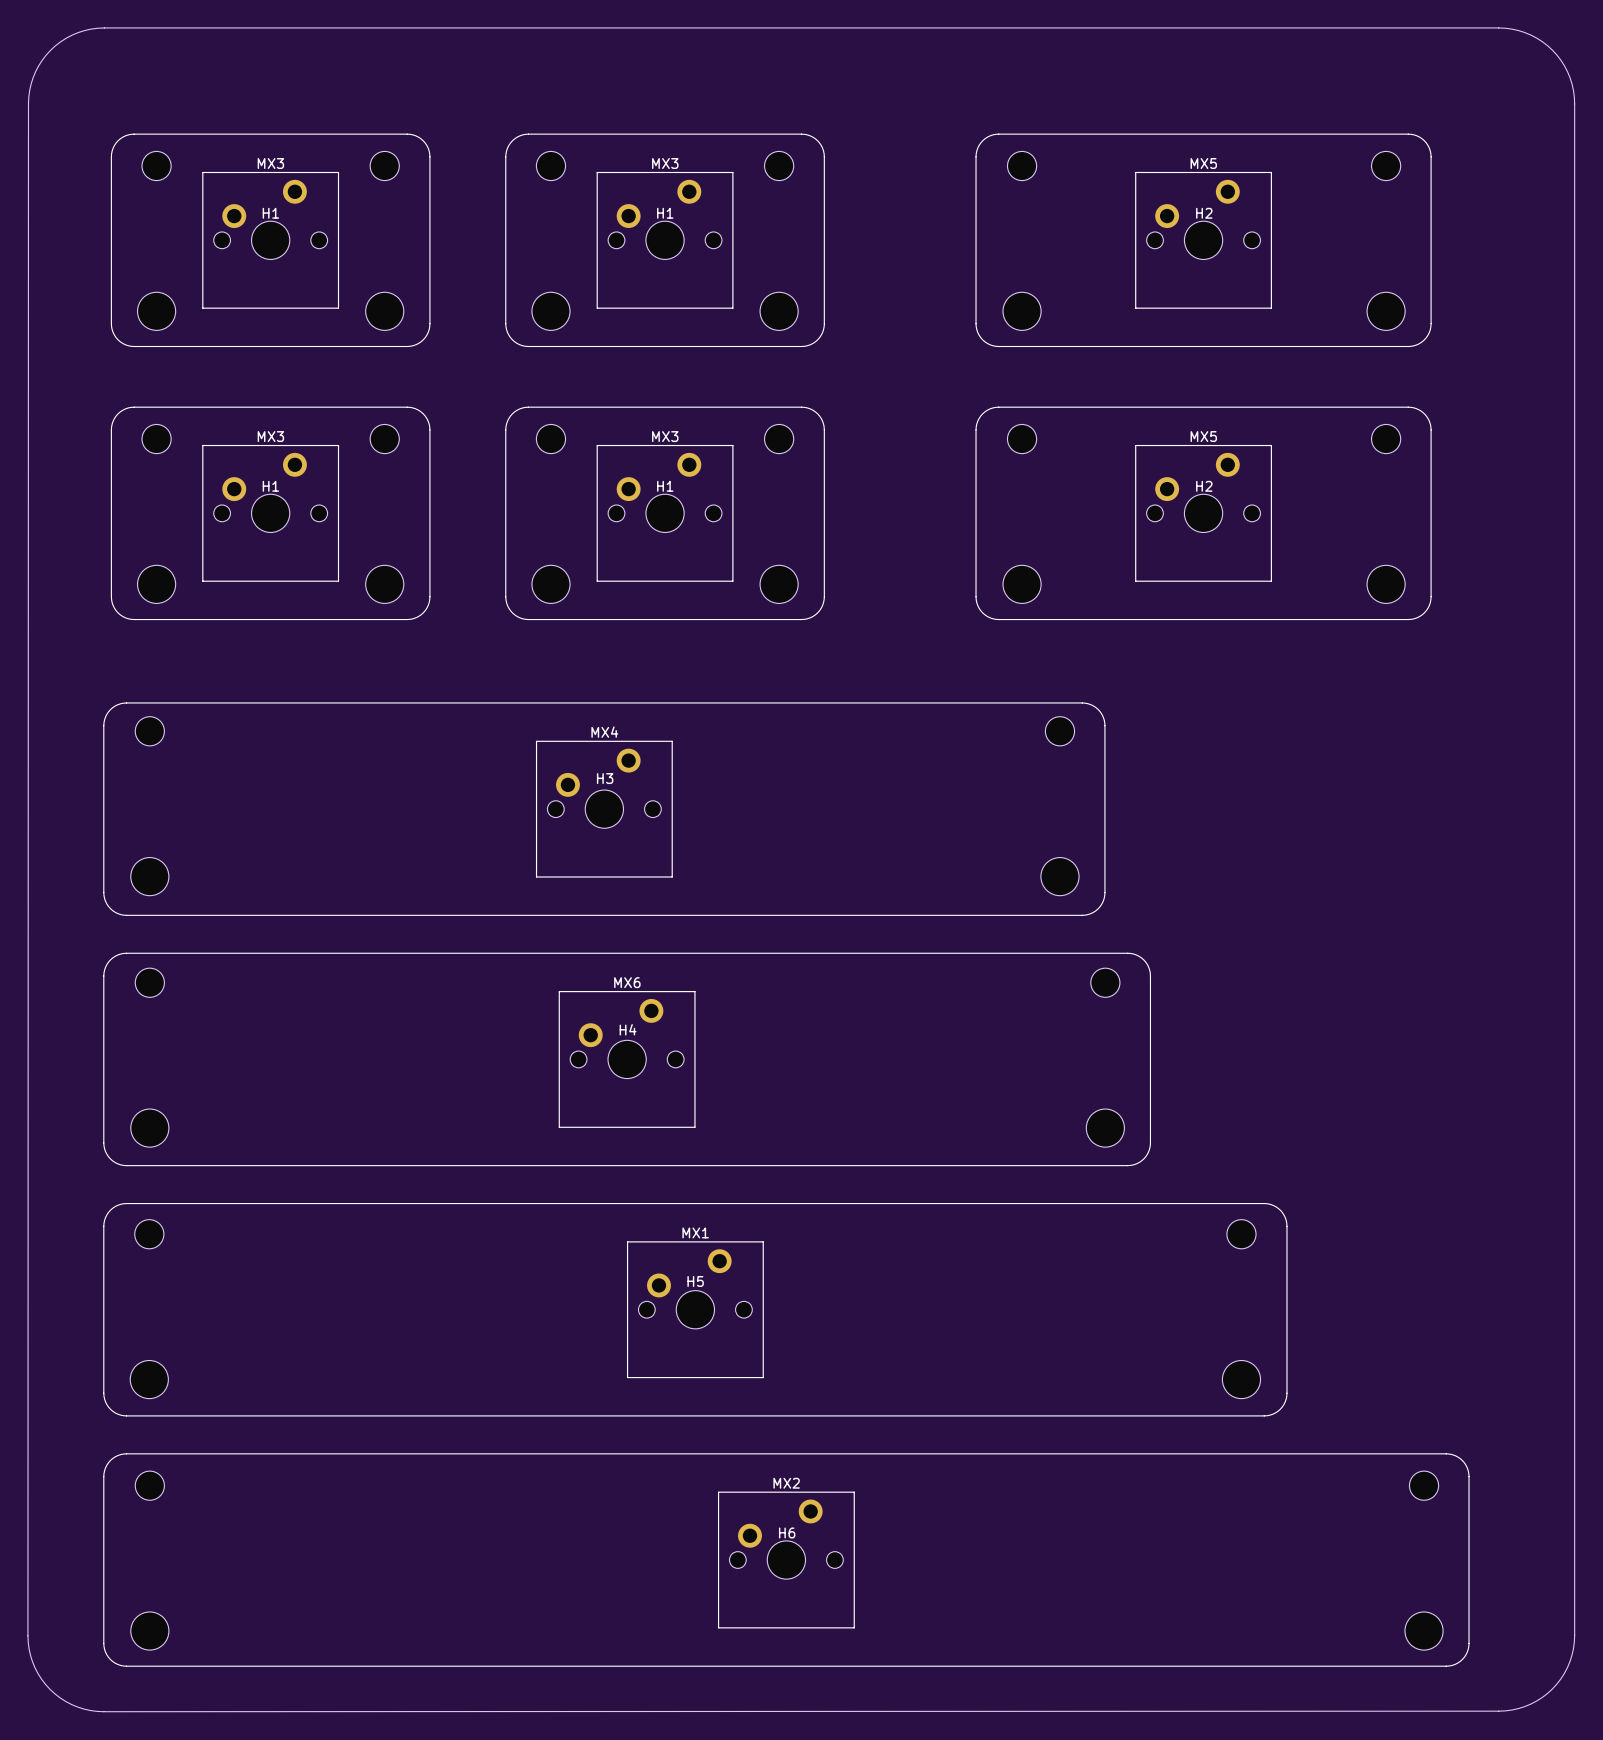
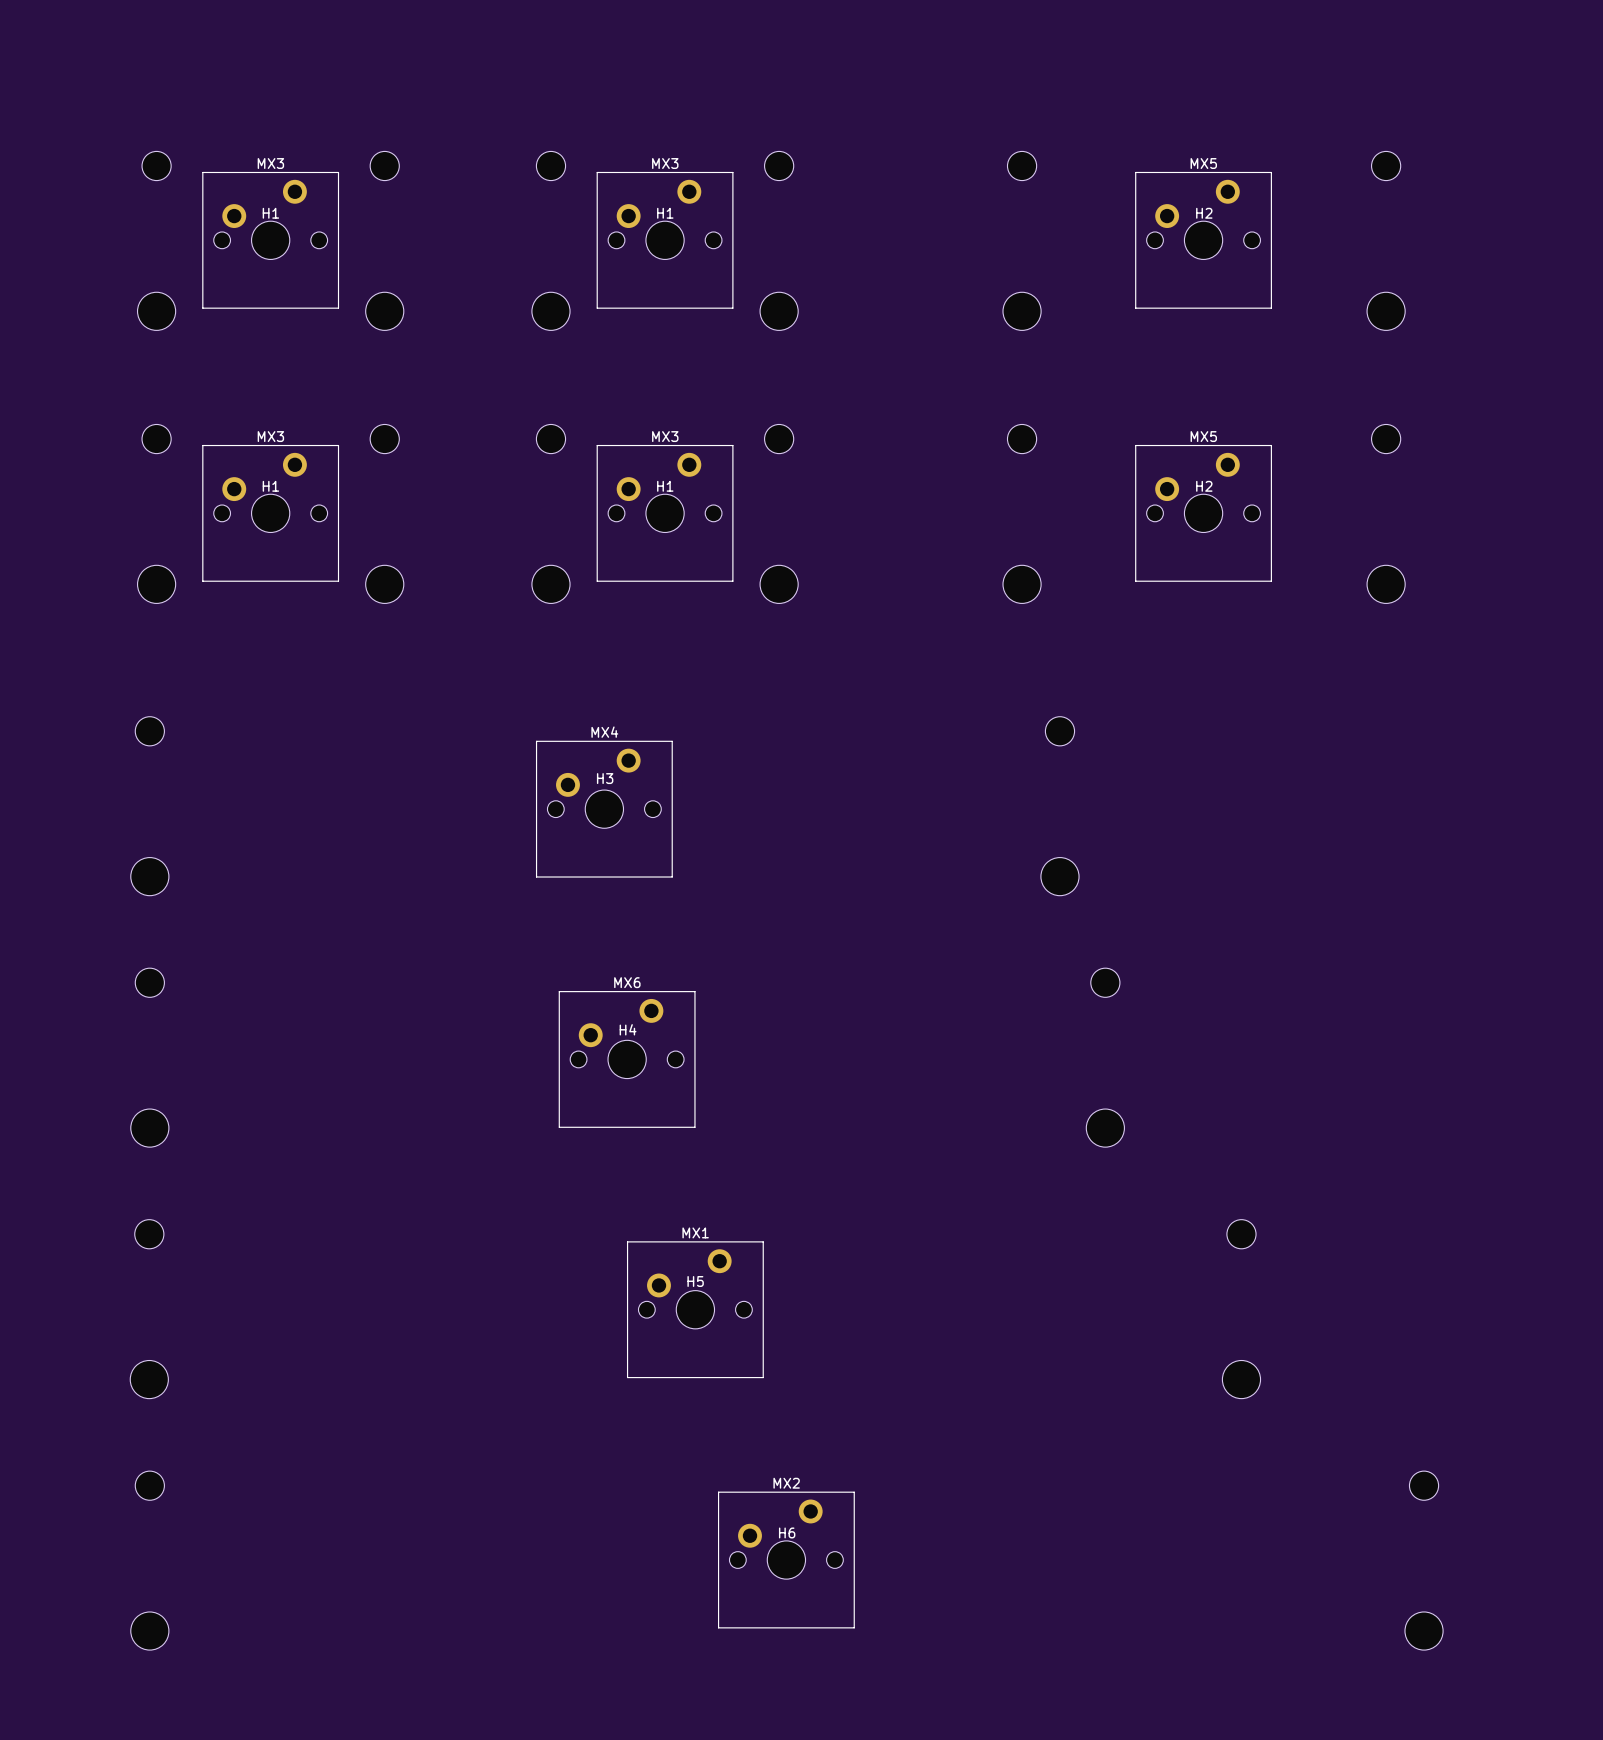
board edge: (104, 27) (1498, 27) (1511, 29) (1530, 35) (1542, 41) (1556, 55) (1570, 77) (1574, 103) (1574, 1635) (1573, 1648) (1567, 1667) (1560, 1678) (1547, 1693) (1524, 1706) (1498, 1711) (103, 1711) (90, 1710) (71, 1704) (60, 1697) (45, 1684) (32, 1661) (27, 1635) (28, 103) (33, 77) (38, 65) (50, 50) (66, 38) (78, 32) (104, 27) -> none
line: (134, 134) (407, 134) (421, 138) (428, 148) (429, 156) (429, 323) (425, 337) (418, 343) (407, 346) (134, 346) (120, 341) (113, 332) (111, 323) (111, 153) (114, 145) (120, 138) (134, 134) -> none
line: (528, 134) (801, 134) (815, 138) (822, 148) (824, 156) (824, 323) (819, 337) (812, 343) (801, 346) (528, 346) (514, 341) (507, 332) (505, 323) (505, 153) (508, 145) (514, 138) (528, 134) -> none
line: (998, 134) (1408, 134) (1417, 135) (1426, 143) (1431, 156) (1431, 323) (1429, 332) (1419, 343) (1408, 346) (998, 346) (990, 344) (980, 337) (976, 326) (976, 156) (977, 148) (982, 140) (990, 135) (998, 134) -> none
line: (134, 407) (407, 407) (421, 411) (428, 421) (429, 429) (429, 596) (425, 610) (418, 616) (407, 619) (134, 619) (120, 614) (113, 605) (111, 596) (111, 426) (114, 418) (120, 411) (134, 407) -> none
line: (528, 407) (801, 407) (815, 411) (822, 421) (824, 429) (824, 596) (819, 610) (812, 616) (801, 619) (528, 619) (514, 614) (507, 605) (505, 596) (505, 426) (508, 418) (514, 411) (528, 407) -> none
line: (998, 407) (1408, 407) (1418, 409) (1427, 417) (1430, 427) (1431, 596) (1429, 605) (1419, 616) (1408, 619) (998, 619) (990, 617) (980, 610) (976, 599) (976, 429) (977, 421) (982, 413) (990, 408) (998, 407) -> none
line: (126, 702) (1087, 703) (1098, 709) (1104, 723) (1104, 895) (1101, 903) (1096, 910) (1082, 915) (123, 915) (110, 908) (103, 895) (103, 725) (105, 717) (110, 709) (117, 704) (126, 702) -> none
line: (126, 953) (1132, 953) (1143, 959) (1150, 973) (1150, 1145) (1147, 1154) (1141, 1160) (1127, 1165) (123, 1165) (110, 1158) (103, 1145) (103, 976) (105, 967) (110, 959) (117, 954) (126, 953) -> none
line: (126, 1203) (1266, 1203) (1280, 1210) (1286, 1223) (1286, 1396) (1283, 1404) (1278, 1411) (1264, 1415) (123, 1415) (110, 1409) (103, 1396) (103, 1226) (105, 1217) (110, 1210) (117, 1205) (126, 1203) -> none
line: (126, 1453) (1448, 1453) (1462, 1460) (1468, 1474) (1468, 1646) (1465, 1654) (1460, 1661) (1446, 1666) (123, 1666) (110, 1659) (103, 1646) (103, 1476) (105, 1467) (110, 1460) (117, 1455) (126, 1453) -> none

